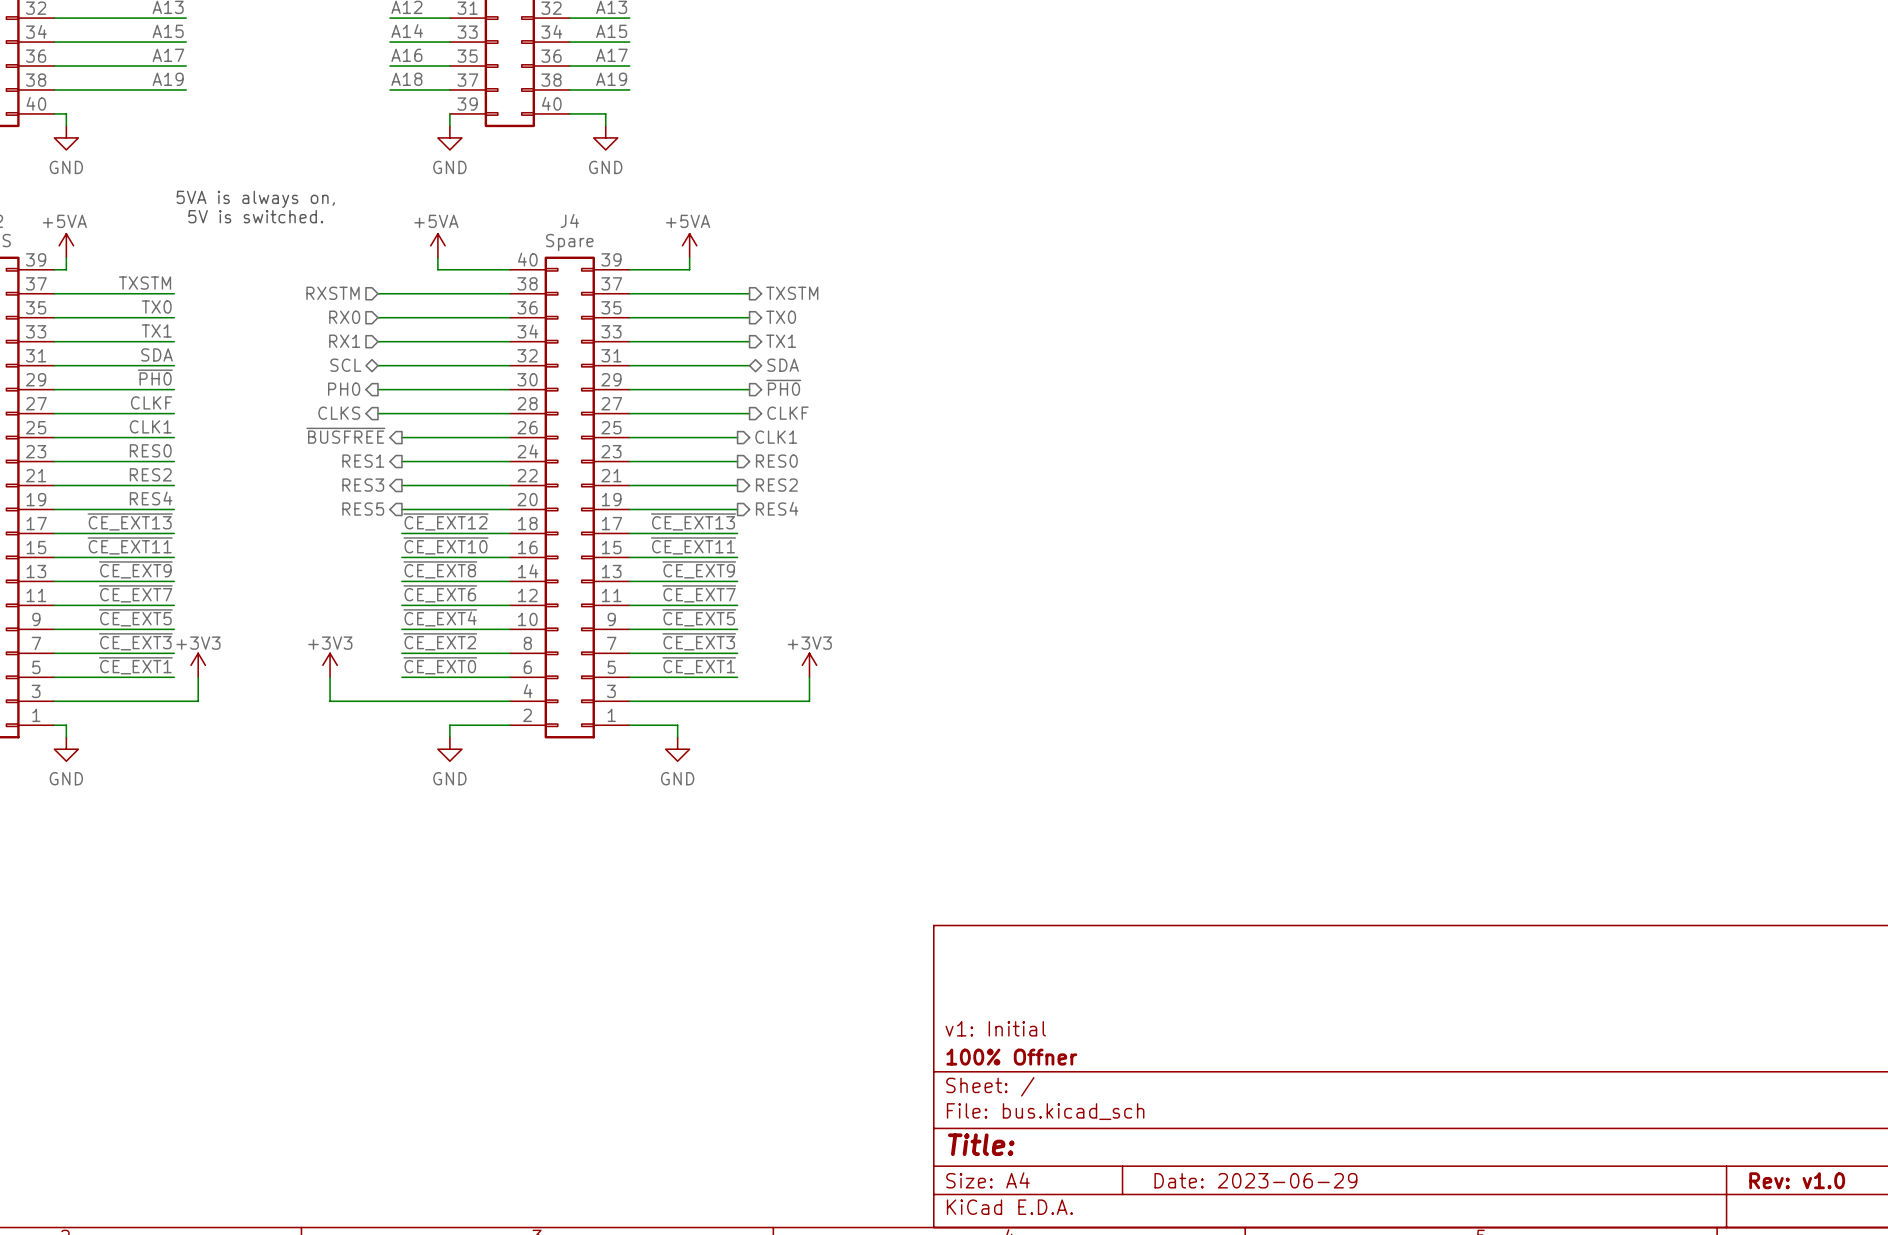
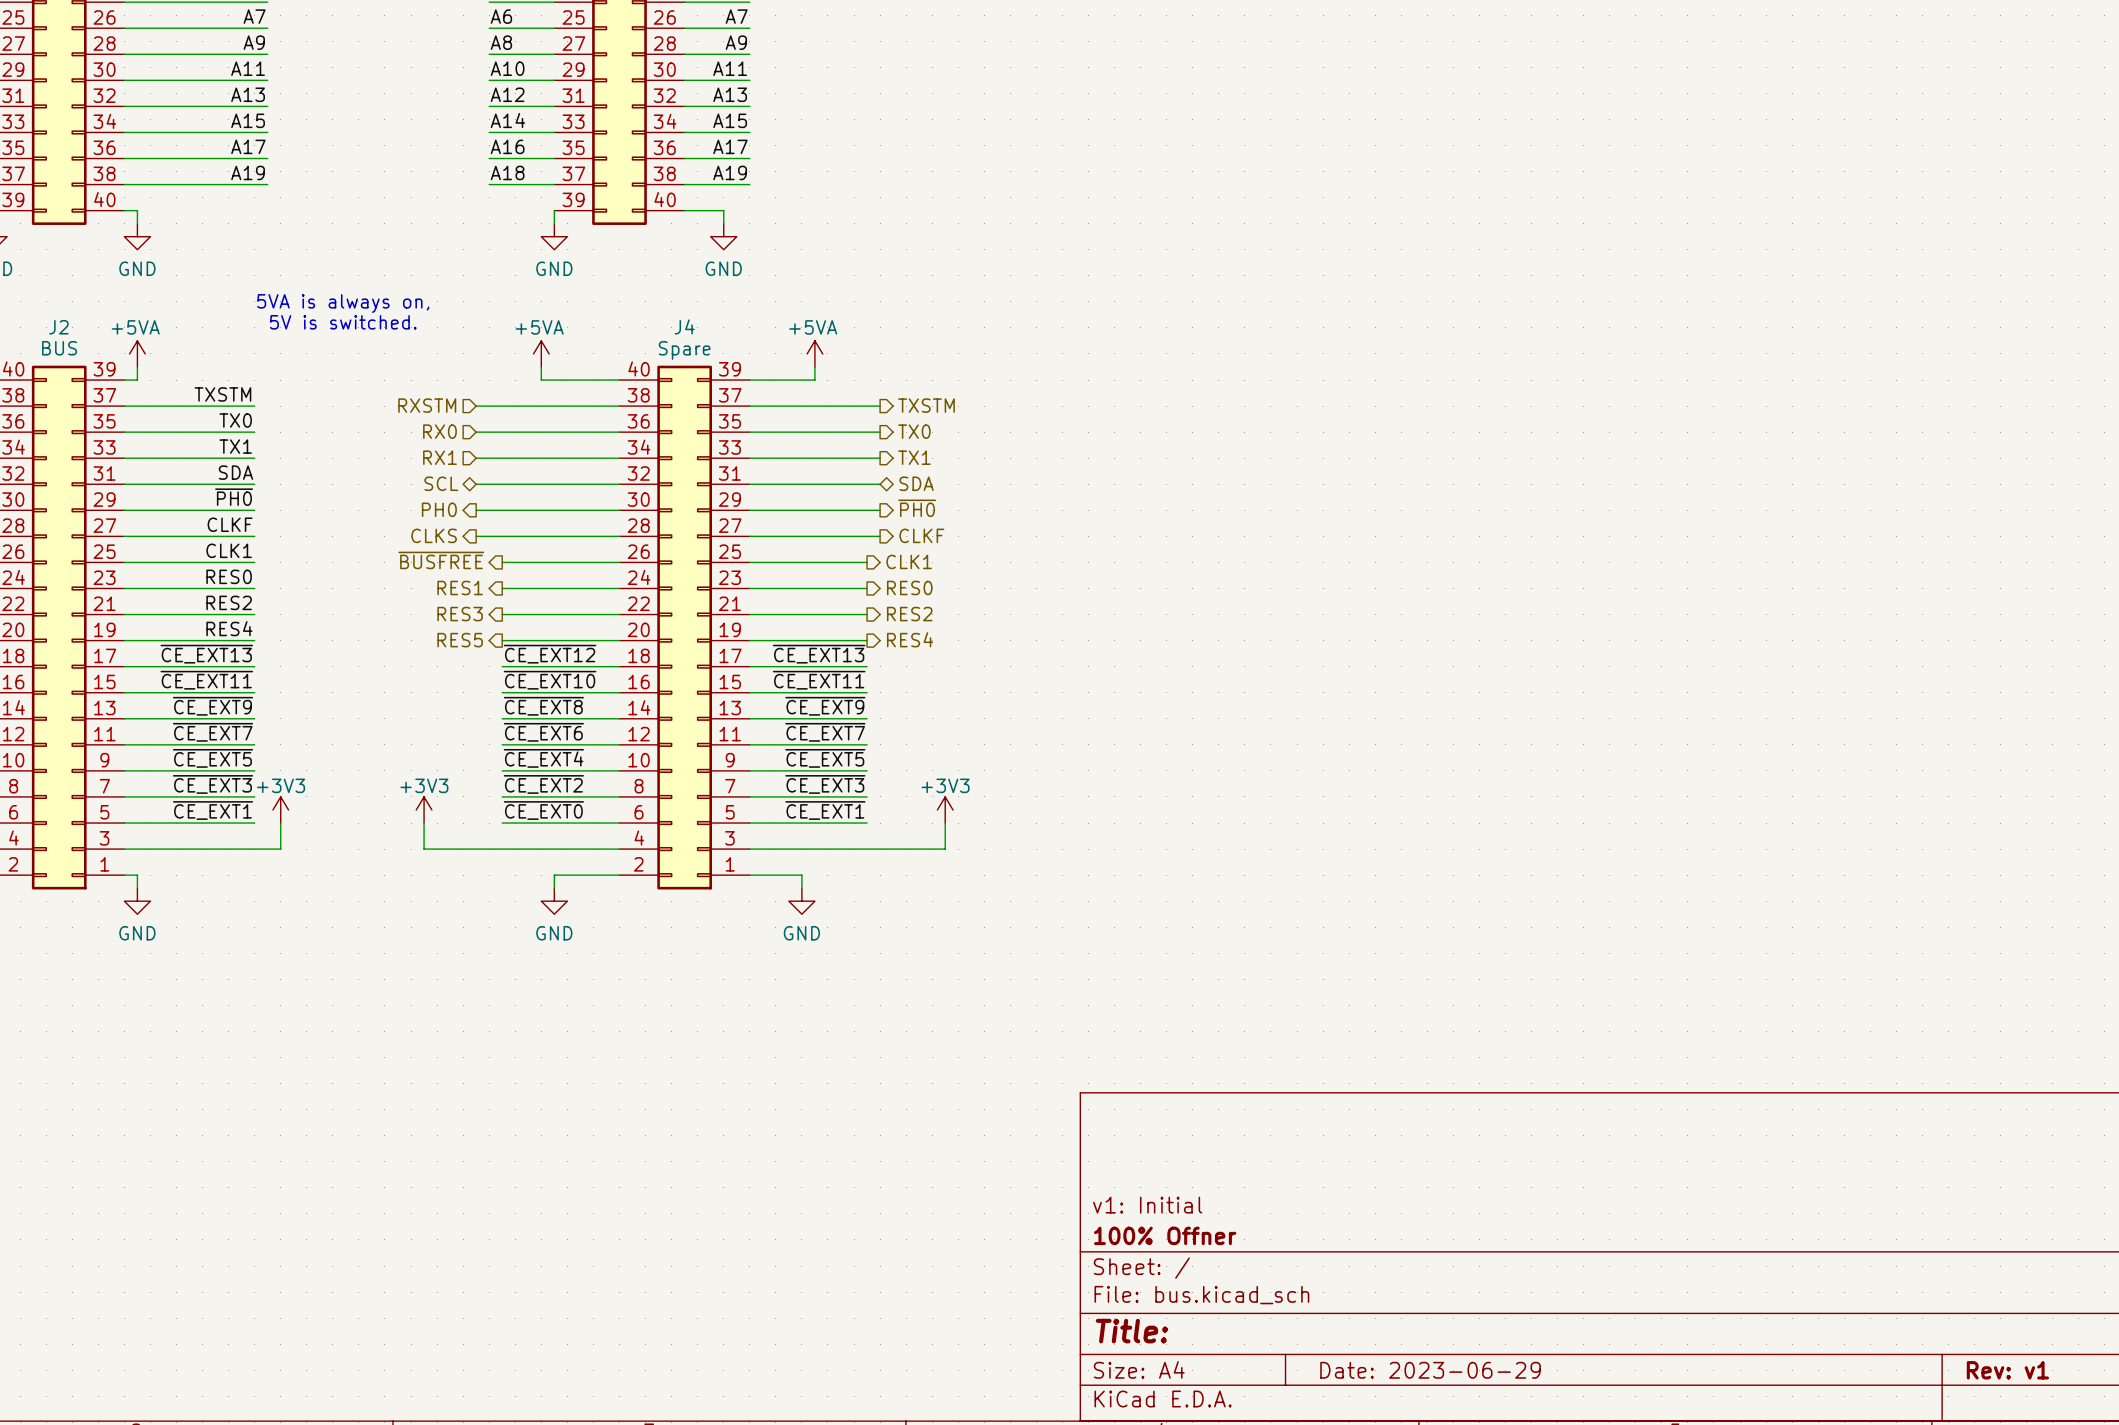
title block: Rev: v1.0 (1797, 1180) -> Rev: v1 (2007, 1370)

